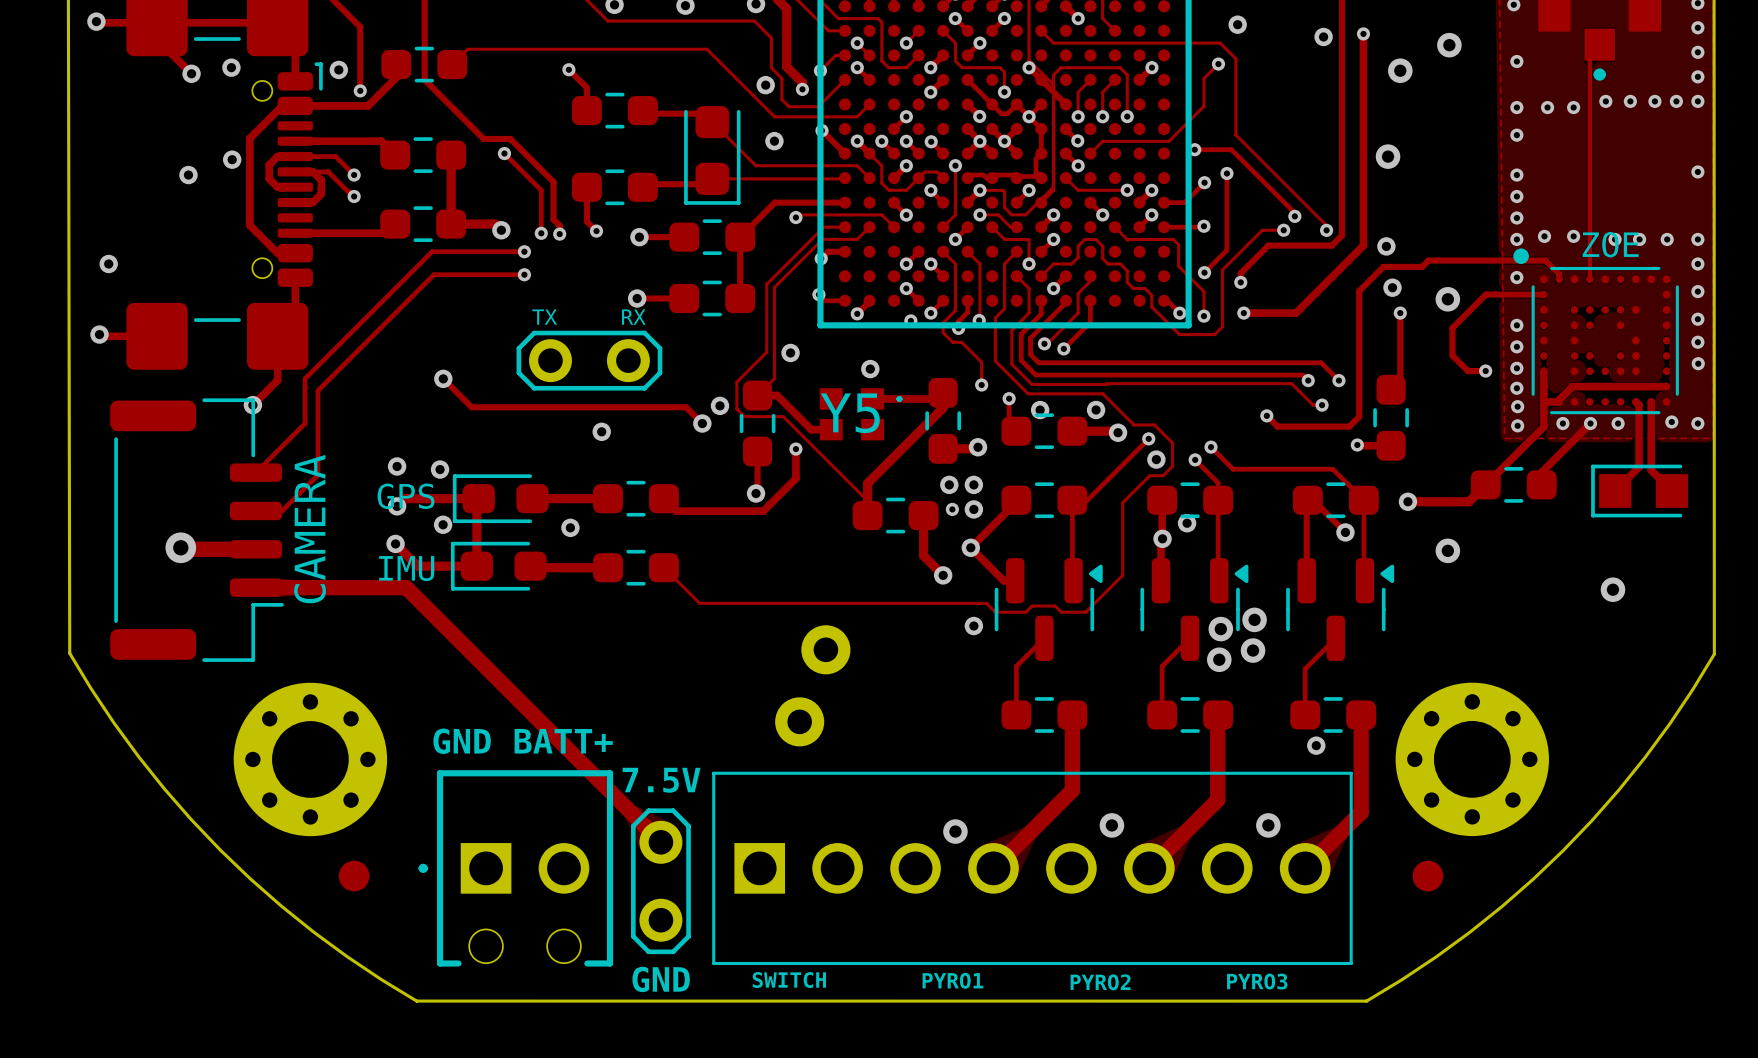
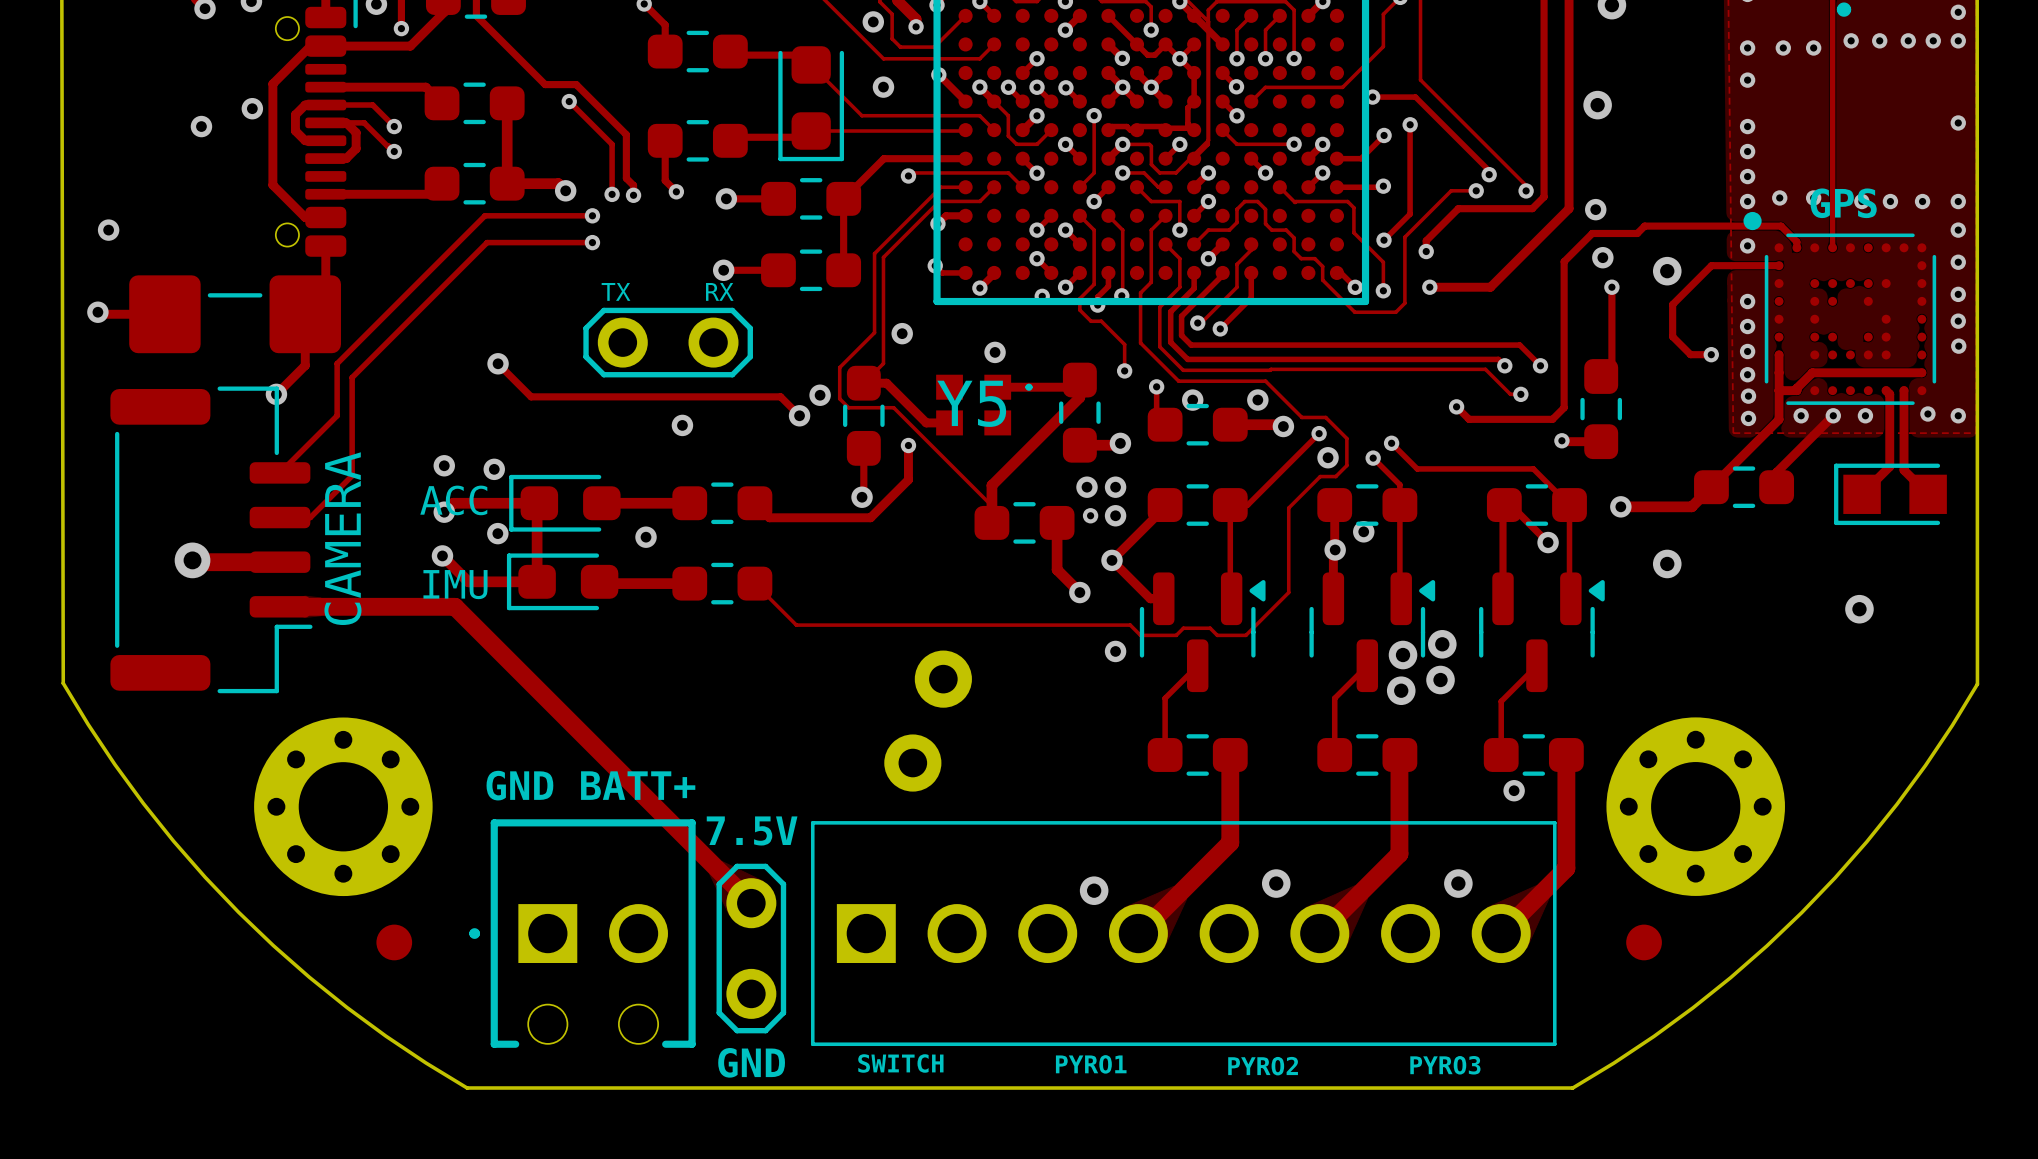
track: (918, 178) (924, 172) (937, 172) (943, 178) -> none
part value: none -> GPS (1843, 203)
text: ZOE (1610, 244) -> none
text: GPS (406, 496) -> ACC (453, 500)

